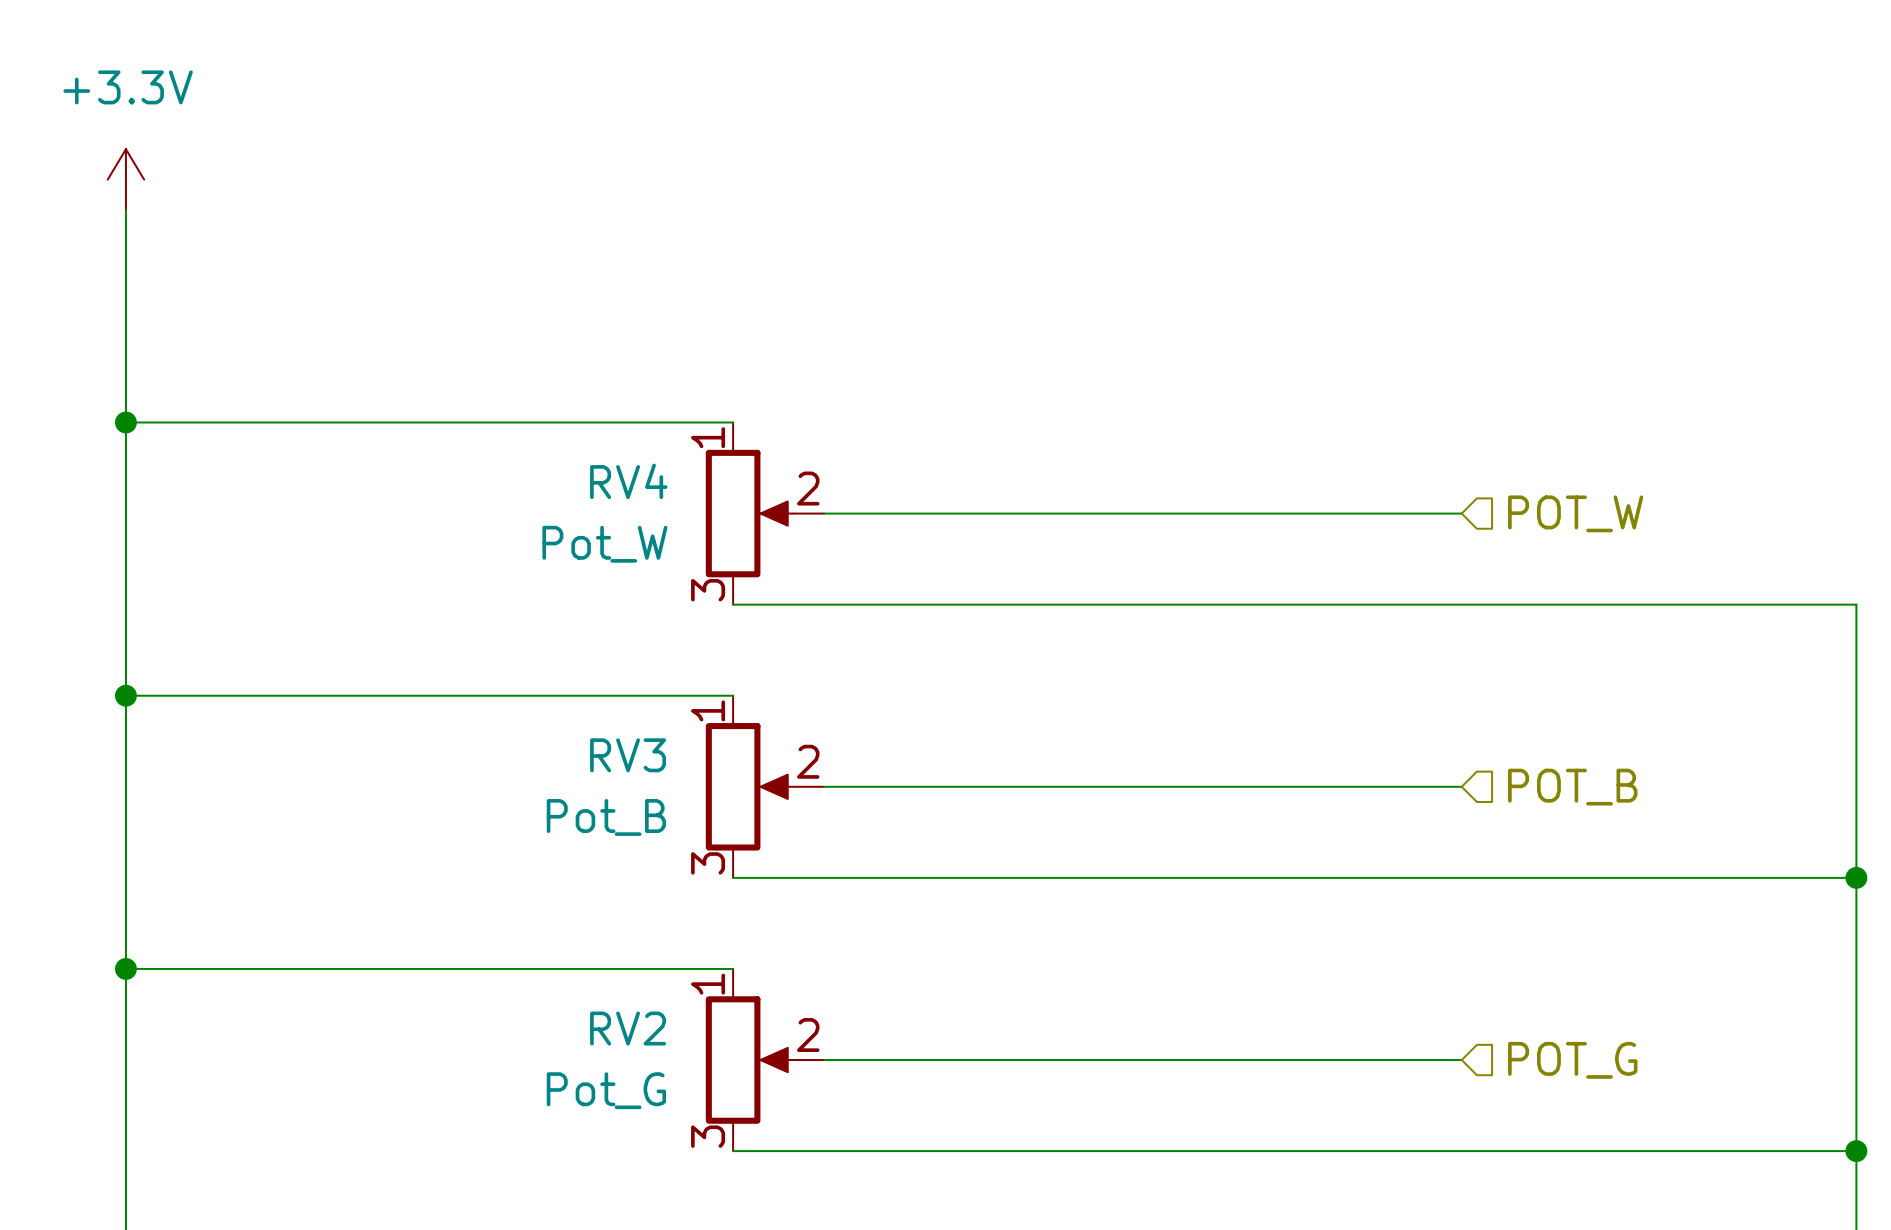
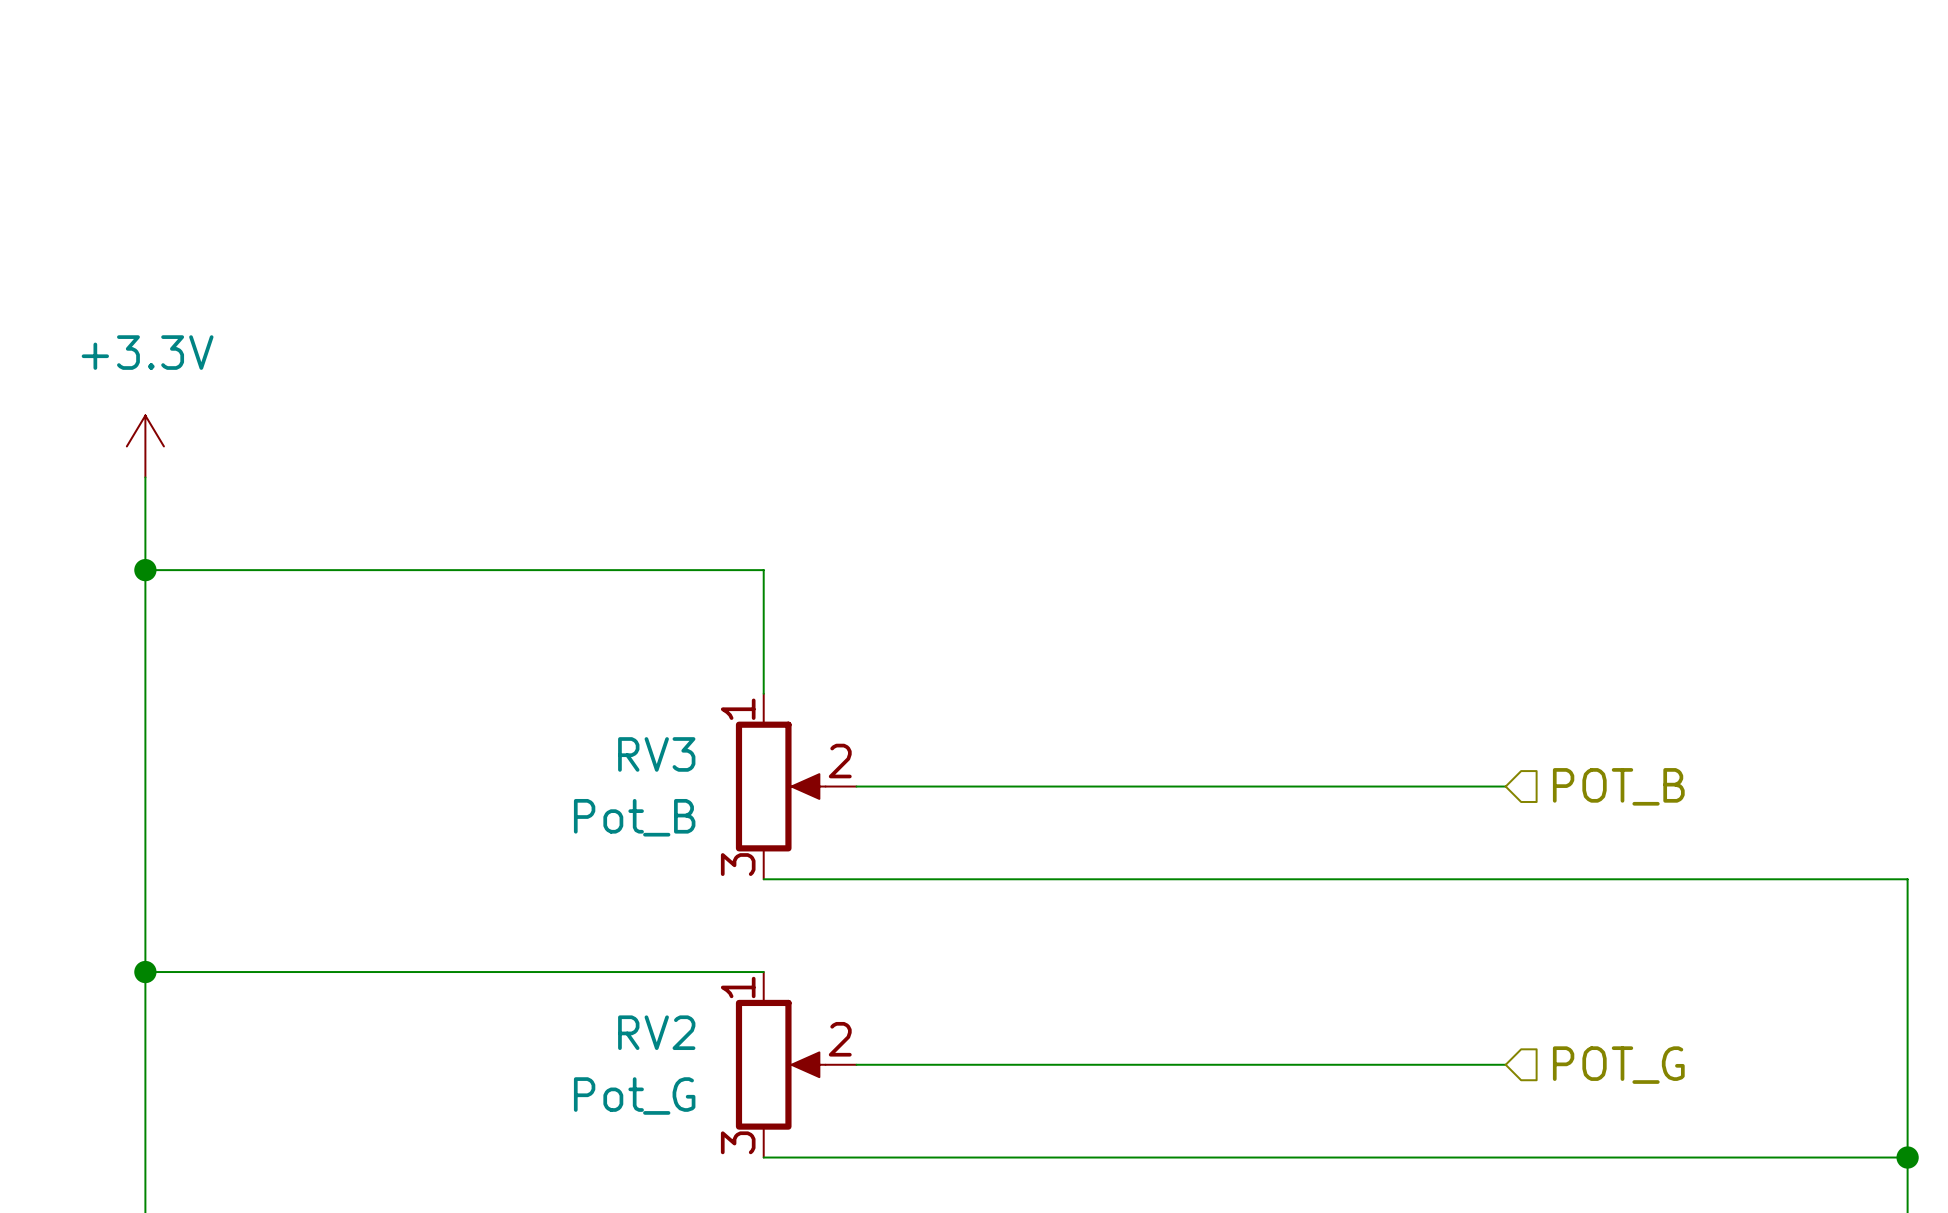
power symbol position: +3.3V (125, 179) -> +3.3V (145, 446)
wire: (125, 209) (125, 483) -> none
wire: (125, 422) (733, 422) -> none
junction: (125, 422) -> none
RV4: Pot_W (764, 513) -> none
wire: (824, 513) (1461, 513) -> none
hierarchical label: POT_W (1575, 513) -> none
junction: none -> (145, 570)
wire: (733, 604) (1856, 604) (1856, 877) -> none
wire: (125, 695) (733, 695) -> (145, 570) (763, 570) (763, 693)
junction: (125, 695) -> none
junction: (1856, 877) -> none

